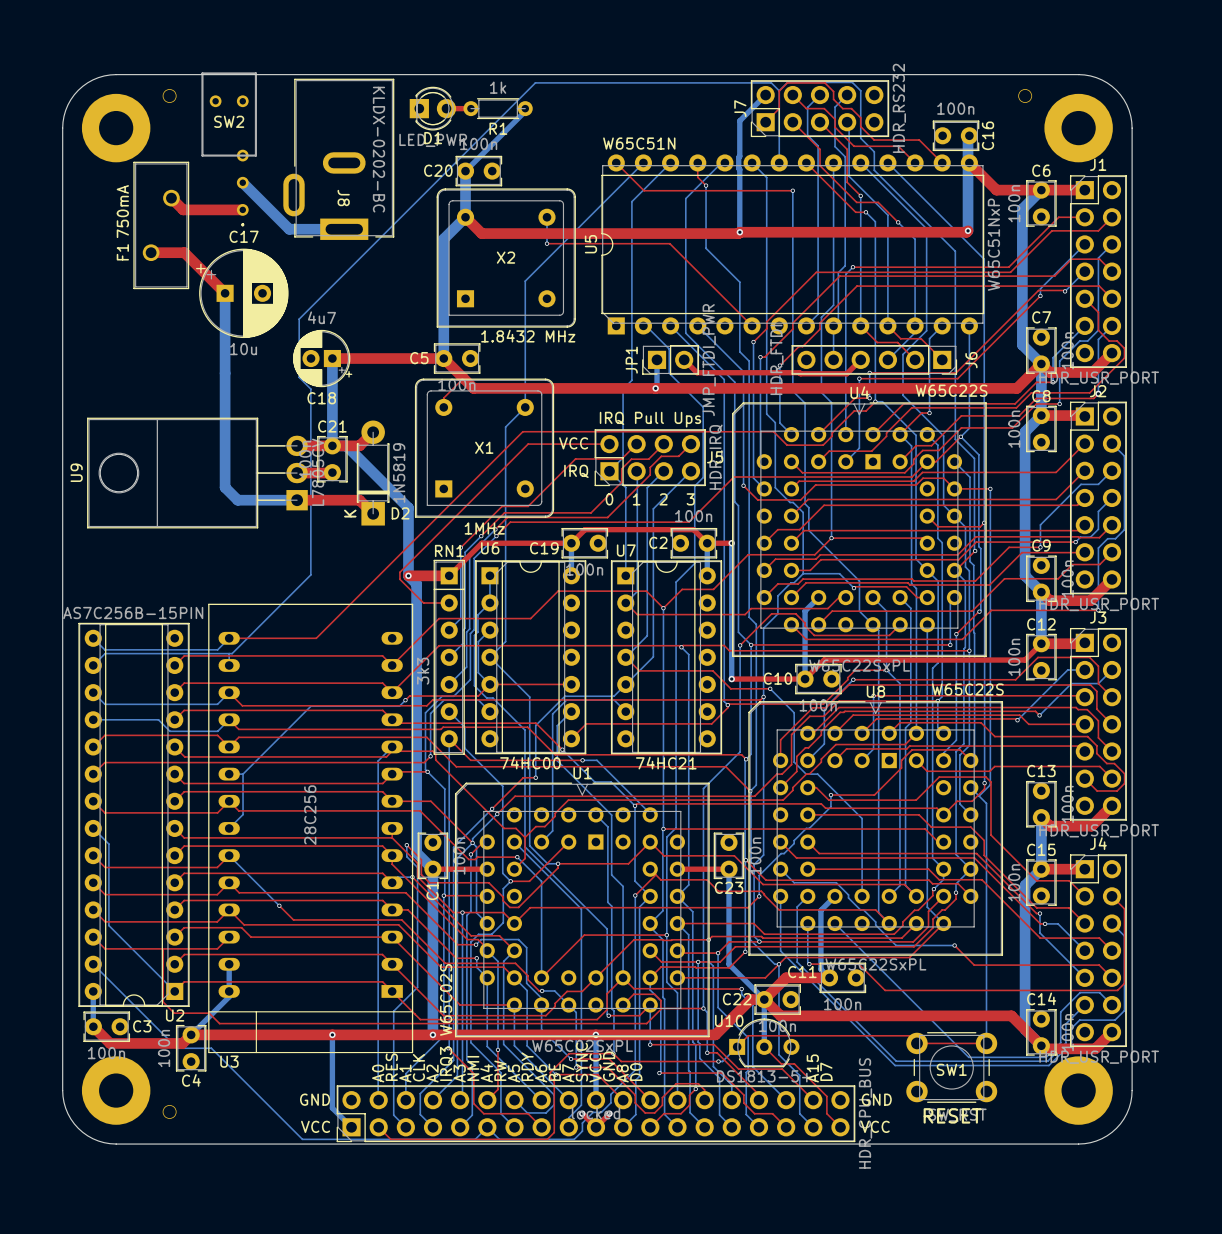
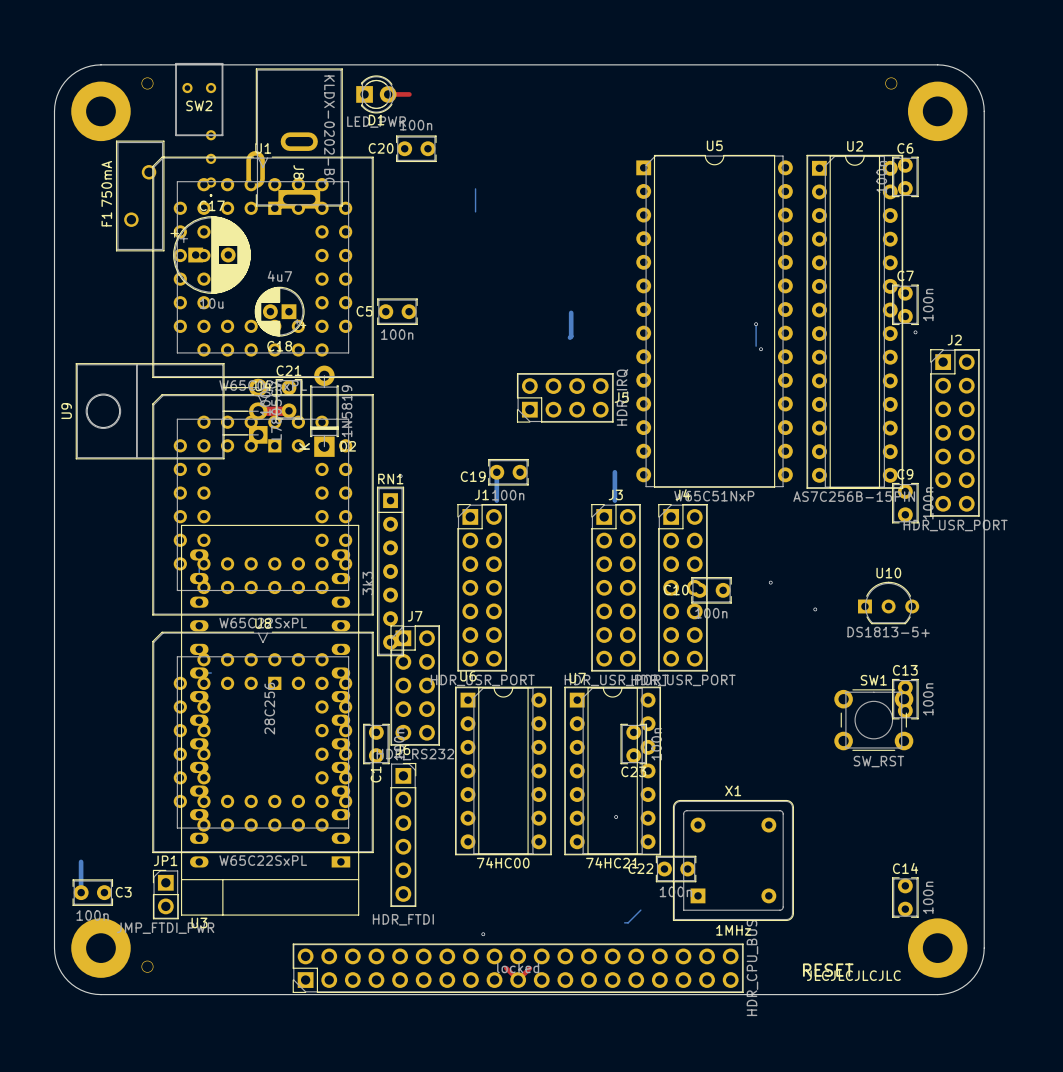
bottom track: (779, 90) (771, 82) (535, 82) (299, 319) (299, 377) (310, 389) (310, 574) (232, 653) (105, 653) (93, 665) -> none
bottom track: (779, 90) (787, 82) (852, 82) (860, 90) (860, 138) (874, 151) (874, 170) (955, 251) (955, 439) (974, 458) (975, 551) -> none
bottom track: (779, 90) (779, 162) -> none
bottom track: (765, 95) (739, 120) (739, 232) -> none
top track: (792, 95) (806, 108) (824, 108) (835, 119) (835, 127) (854, 146) (898, 146) (915, 162) -> none
bottom track: (819, 95) (807, 107) (807, 135) (818, 145) (818, 314) (806, 325) -> none
bottom track: (847, 95) (835, 107) (835, 146) (845, 156) (845, 265) (838, 272) (838, 321) (833, 325) (833, 359) -> none
R1: 1k (498, 108) -> none
bottom track: (525, 108) (525, 111) (465, 171) (465, 217) (443, 239) (443, 358) -> none
J7 rotation: 0° (819, 108) -> 90° clockwise (415, 685)
J7 position: (819, 108) -> (415, 685)
top track: (765, 122) (779, 108) (779, 91) (787, 82) (824, 82) (833, 91) (833, 99) (842, 108) (851, 108) (860, 117) (860, 126) (874, 140) (919, 140) (942, 162) -> none
top track: (792, 122) (819, 149) (819, 165) (856, 202) (878, 202) (898, 222) -> none
top track: (819, 122) (847, 149) (847, 182) (860, 195) -> none
bottom track: (847, 122) (849, 124) (849, 176) (887, 215) (887, 325) -> none
C16: 100n (956, 135) -> none
bottom track: (969, 135) (968, 230) -> none
text: W65C51N (639, 143) -> none
top track: (616, 162) (644, 190) (792, 190) -> none
bottom track: (643, 162) (525, 281) (525, 407) (505, 427) (505, 641) (489, 657) (529, 697) (529, 845) (547, 863) (558, 863) -> none
bottom track: (670, 162) (631, 201) (631, 380) (623, 389) (623, 457) (609, 471) (625, 487) (625, 575) -> none
top track: (697, 162) (697, 177) (706, 185) -> none
bottom track: (724, 162) (721, 162) (685, 198) (685, 333) (734, 382) (734, 501) (738, 505) (738, 632) (751, 644) (751, 754) (745, 760) (745, 860) -> none
bottom track: (752, 162) (766, 177) (766, 414) (775, 422) (775, 487) (803, 512) (803, 573) -> none
top track: (806, 162) (855, 212) (865, 212) -> none
bottom track: (833, 162) (833, 305) (821, 317) (821, 392) (831, 402) (831, 538) -> none
bottom track: (860, 162) (926, 228) (926, 330) (902, 354) (902, 395) (943, 435) (943, 505) (965, 527) (965, 567) (969, 570) (969, 745) (959, 755) (959, 803) (970, 814) -> none
bottom track: (887, 162) (984, 259) (984, 783) -> none
top track: (969, 162) (996, 190) (1084, 190) -> none
bottom track: (242, 182) (289, 229) (344, 229) -> none
bottom track: (706, 185) (706, 248) (739, 282) (739, 351) (749, 361) (749, 617) (756, 624) (756, 785) (750, 791) (750, 939) (774, 964) (778, 964) (778, 1054) (799, 1075) (799, 1113) (813, 1127) -> none
via: (706, 185) -> none
bottom track: (792, 190) (792, 391) (805, 403) (805, 503) (808, 507) (808, 530) (859, 581) (859, 611) (878, 630) (878, 912) (889, 923) -> none
via: (792, 190) -> none
bottom track: (1041, 190) (1022, 209) (1022, 344) (1041, 363) (1041, 415) (1025, 431) (1025, 575) (1041, 592) (1041, 643) -> none
bottom track: (860, 195) (860, 325) -> none
via: (860, 195) -> none
top track: (171, 198) (183, 209) (242, 209) -> none
bottom track: (865, 212) (875, 221) (875, 401) (882, 401) (916, 435) (916, 559) (938, 581) (938, 662) (932, 668) (932, 858) (943, 869) (943, 879) (933, 889) -> none
via: (865, 212) -> none
top track: (465, 217) (481, 233) (968, 230) -> none
top track: (1084, 217) (1058, 217) (1008, 267) (852, 267) -> none
top track: (1112, 217) (1098, 230) (1051, 230) (1010, 272) (816, 272) (767, 321) (767, 328) (753, 342) -> none
bottom track: (898, 222) (915, 239) (915, 332) (887, 359) -> none
via: (898, 222) -> none
via: (968, 230) -> none
via: (739, 232) -> none
top track: (547, 243) (669, 243) (752, 325) -> none
via: (547, 243) -> none
U5 rotation: 0° (792, 244) -> 90° clockwise (714, 321)
bottom track: (1084, 244) (1040, 288) (1040, 295) -> none
bottom track: (1112, 244) (1098, 258) (1098, 330) (1087, 341) (1079, 341) (1059, 361) (1059, 404) -> none
top track: (151, 252) (184, 252) (225, 293) -> none
X2: 1.8432 MHz (506, 258) -> none
bottom track: (852, 267) (845, 274) (845, 434) -> none
via: (852, 267) -> none
bottom track: (1084, 271) (1065, 291) -> none
J1 position: (1098, 271) -> (482, 587)
top track: (1112, 271) (1099, 259) (1071, 259) (1054, 276) (839, 276) (792, 323) (792, 329) (764, 357) (760, 357) -> none
top track: (1065, 291) (1038, 290) (956, 372) (869, 372) -> none
via: (1065, 291) -> none
top track: (1040, 295) (957, 378) (859, 378) -> none
via: (1040, 295) -> none
top track: (1084, 298) (1098, 312) (1098, 330) (1109, 341) (1117, 341) (1124, 348) (1124, 358) (1089, 392) (1031, 392) (1016, 407) (911, 407) (871, 451) (829, 451) (818, 461) -> none
top track: (1112, 298) (1099, 286) (856, 286) (819, 323) (819, 329) (779, 365) -> none
bottom track: (643, 325) (646, 325) (669, 349) (669, 373) (703, 407) (703, 477) (694, 486) (694, 563) (676, 582) (676, 827) (666, 837) (666, 982) (677, 992) (677, 1100) -> none
bottom track: (670, 325) (724, 379) (724, 701) (727, 705) -> none
bottom track: (697, 325) (743, 371) (743, 485) -> none
top track: (860, 325) (877, 342) (897, 342) (915, 359) -> none
top track: (887, 325) (900, 338) (921, 338) (942, 359) -> none
bottom track: (942, 325) (929, 338) (929, 413) -> none
bottom track: (969, 325) (969, 428) (960, 436) (978, 454) (978, 546) (980, 548) (979, 611) -> none
bottom track: (1084, 325) (1053, 357) (1053, 382) -> none
bottom track: (1112, 325) (1098, 339) (1098, 393) -> none
bottom track: (753, 342) (753, 478) (764, 488) -> none
via: (753, 342) -> none
top track: (1112, 353) (1092, 372) (1049, 372) (1041, 363) (1016, 388) (473, 388) (463, 378) -> none
bottom track: (760, 357) (760, 457) (764, 461) -> none
via: (760, 357) -> none
top track: (332, 358) (443, 358) (463, 378) -> none
bottom track: (332, 358) (332, 445) (346, 445) (408, 507) (408, 575) (416, 583) (416, 852) (432, 869) (432, 1034) -> none
JP1 rotation: 0° (670, 359) -> 90° clockwise (165, 894)
JP1 position: (670, 359) -> (165, 894)
top track: (684, 359) (697, 372) (800, 373) (846, 373) (860, 359) -> none
J6 rotation: 0° (874, 359) -> 90° counterclockwise (403, 834)
J6 position: (874, 359) -> (403, 834)
bottom track: (779, 365) (779, 423) (791, 434) -> none
via: (779, 365) -> none
bottom track: (225, 373) (225, 293) (225, 487) (237, 500) (297, 500) -> none
top track: (463, 378) (443, 398) (443, 407) -> none
bottom track: (859, 378) (859, 448) (845, 461) -> none
via: (859, 378) -> none
top track: (1053, 382) (1036, 382) (1015, 403) (903, 403) (872, 434) -> none
via: (655, 388) -> none
text: W65C22S (951, 390) -> none
top track: (1098, 393) (1093, 398) (1036, 398) (1019, 415) (961, 415) (931, 445) (916, 445) (900, 461) -> none
via: (1098, 393) -> none
top track: (869, 398) (855, 398) (818, 434) -> none
via: (869, 398) -> none
top track: (875, 401) (866, 411) (854, 411) (823, 445) (787, 445) (773, 431) (522, 431) (316, 638) (229, 638) -> none
top track: (1059, 404) (1036, 404) (1012, 427) (961, 427) (938, 450) (922, 450) (904, 472) (802, 472) (791, 461) -> none
via: (1059, 404) -> none
top track: (929, 413) (921, 413) (900, 434) -> none
via: (929, 413) -> none
top track: (1041, 415) (1084, 416) -> none
text: IRQ Pull Ups (650, 419) -> none
C8: 100n (1041, 428) -> none
top track: (373, 432) (359, 445) (297, 445) -> none
bottom track: (900, 434) (911, 446) (911, 583) (916, 588) (916, 733) -> none
bottom track: (927, 434) (937, 445) (937, 538) (942, 542) (942, 696) (937, 701) (937, 727) (943, 733) -> none
top track: (960, 436) (935, 461) (927, 461) (912, 477) (733, 477) (688, 522) (510, 522) (496, 536) -> none
via: (960, 436) -> none
text: VCC (573, 443) -> none
top track: (1084, 443) (1056, 472) (922, 472) (913, 481) (799, 481) (791, 488) -> none
bottom track: (1112, 443) (1124, 456) (1124, 529) (1115, 538) (1107, 538) (1098, 548) (1098, 610) -> none
top track: (609, 444) (528, 444) (399, 572) (399, 579) (423, 602) (449, 602) -> none
top track: (636, 444) (621, 459) (575, 459) (528, 506) (502, 506) (460, 547) -> none
top track: (663, 444) (648, 459) (631, 459) (621, 468) (621, 482) (591, 512) (504, 512) (481, 536) -> none
top track: (690, 444) (678, 456) (661, 456) (650, 467) (650, 474) (607, 517) (507, 517) (495, 529) -> none
X1 name position: X1 (484, 447) -> X1 (733, 790)
X1 position: (484, 448) -> (733, 860)
bottom track: (954, 461) (969, 477) (969, 561) (973, 565) (974, 633) (974, 756) (970, 760) -> none
top track: (1084, 470) (1056, 499) (808, 499) (791, 516) -> none
bottom track: (1112, 470) (1098, 484) (1080, 484) (1040, 524) (1040, 547) -> none
text: IRQ (576, 471) -> none
bottom track: (636, 471) (637, 591) (625, 602) -> none
bottom track: (663, 471) (647, 487) (647, 635) (625, 657) -> none
bottom track: (690, 471) (653, 508) (653, 656) (614, 696) (564, 696) (535, 725) (535, 777) -> none
top track: (743, 485) (757, 499) (800, 499) (815, 485) (916, 485) (923, 478) (943, 478) (954, 488) (990, 488) -> none
via: (743, 485) -> none
bottom track: (990, 488) (990, 784) (979, 796) -> none
via: (990, 488) -> none
top track: (1084, 497) (1077, 505) (824, 505) (799, 529) (777, 529) (764, 543) -> none
bottom track: (1112, 497) (1098, 511) (1098, 529) (1090, 537) (1080, 537) (1075, 542) -> none
text: 0 (609, 499) -> none
text: 1 (636, 499) -> none
text: 2 (663, 499) -> none
text: 3 (690, 499) -> none
top track: (297, 500) (359, 500) (373, 513) -> none
top track: (927, 516) (938, 526) (980, 526) (984, 522) -> none
via: (984, 522) -> none
top track: (1084, 525) (1079, 530) (804, 530) (791, 543) -> none
top track: (1112, 525) (1099, 537) (975, 536) (957, 554) (820, 554) (815, 559) (775, 559) (764, 570) -> none
bottom track: (495, 529) (469, 555) (469, 629) (466, 632) (466, 667) (449, 684) -> none
via: (495, 529) -> none
U4 position: (859, 529) -> (262, 504)
bottom track: (481, 536) (465, 552) (465, 628) (462, 630) (462, 643) (449, 657) -> none
via: (481, 536) -> none
bottom track: (496, 536) (474, 558) (474, 629) (470, 633) (470, 679) (453, 696) (442, 696) (425, 712) (425, 769) (444, 789) (443, 1035) (405, 1073) (405, 1100) -> none
via: (496, 536) -> none
via: (831, 538) -> none
top track: (1075, 542) (976, 542) (958, 559) (820, 559) (810, 570) (791, 570) -> none
via: (1075, 542) -> none
C2: 100n (693, 543) -> none
top track: (731, 543) (707, 543) (693, 529) (585, 529) (571, 543) (481, 543) (449, 575) (408, 575) -> none
bottom track: (731, 543) (731, 679) -> none
via: (731, 543) -> none
top track: (927, 543) (922, 538) (831, 538) (814, 554) (748, 554) (713, 589) (682, 589) (663, 608) (646, 591) (558, 591) (530, 618) (439, 618) (392, 665) (382, 655) (184, 655) (174, 665) -> none
bottom track: (460, 547) (460, 618) (449, 630) -> none
top track: (1040, 547) (1009, 547) (975, 580) (803, 579) (798, 583) (777, 583) (764, 597) -> none
via: (1040, 547) -> none
top track: (975, 551) (954, 570) -> none
via: (975, 551) -> none
top track: (1084, 552) (1022, 552) (989, 585) (806, 582) (791, 597) -> none
top track: (1112, 552) (1099, 564) (1072, 564) (1058, 578) (1004, 578) (972, 611) (832, 611) (818, 624) -> none
bottom track: (954, 570) (965, 581) (963, 743) (956, 751) (956, 854) (970, 869) (956, 883) (956, 892) -> none
bottom track: (803, 573) (839, 573) (853, 588) -> none
bottom track: (803, 573) (777, 595) (777, 613) (763, 628) (763, 855) (754, 864) (754, 936) (759, 941) -> none
via: (408, 575) -> none
bottom track: (489, 575) (489, 602) (477, 614) (477, 632) (474, 635) (474, 685) (486, 698) (492, 698) (524, 730) (524, 846) (607, 929) (607, 1014) (608, 1015) -> none
top track: (1112, 579) (1090, 600) (1049, 600) (1041, 592) -> none
top track: (853, 588) (906, 586) (917, 597) (927, 597) -> none
via: (853, 588) -> none
bottom track: (818, 597) (805, 611) (805, 679) -> none
top track: (845, 597) (838, 597) (827, 608) (751, 608) (745, 614) (637, 614) (625, 602) -> none
bottom track: (872, 597) (886, 611) (886, 670) (899, 683) (899, 885) (889, 896) -> none
bottom track: (900, 597) (910, 608) (910, 722) (905, 727) (905, 885) (916, 896) -> none
bottom track: (954, 597) (950, 601) (950, 644) -> none
bottom track: (663, 608) (662, 910) (650, 923) (650, 927) (662, 939) (664, 1114) (677, 1127) -> none
via: (663, 608) -> none
top track: (1098, 610) (991, 610) (962, 639) (806, 639) (791, 624) -> none
via: (1098, 610) -> none
top track: (979, 611) (956, 634) -> none
via: (979, 611) -> none
top track: (900, 624) (889, 635) (814, 635) (795, 613) (771, 613) (740, 645) -> none
bottom track: (927, 624) (927, 907) (943, 923) -> none
bottom track: (489, 630) (478, 641) (478, 672) (489, 684) -> none
bottom track: (956, 634) (956, 740) (943, 753) (943, 760) -> none
via: (956, 634) -> none
bottom track: (93, 638) (104, 649) (217, 649) (229, 638) -> none
top track: (1084, 642) (1041, 643) (1025, 660) (824, 660) (805, 679) (731, 679) -> none
top track: (751, 644) (950, 644) -> none
via: (751, 644) -> none
via: (950, 644) -> none
bottom track: (740, 645) (740, 751) (703, 788) (703, 1008) (707, 1012) (707, 1052) -> none
via: (740, 645) -> none
bottom track: (681, 647) (688, 654) (688, 885) (677, 896) (692, 911) (692, 1042) (695, 1045) (695, 1089) -> none
via: (681, 647) -> none
top track: (969, 650) (729, 650) (724, 645) (683, 645) (681, 647) (679, 645) (439, 645) (392, 692) (382, 683) (184, 683) (174, 692) -> none
via: (969, 650) -> none
U6 position: (530, 657) -> (503, 770)
top track: (625, 657) (639, 670) (712, 670) (730, 688) (770, 688) -> none
U7 position: (666, 657) -> (612, 770)
C12: 100n (1041, 657) -> none
top track: (886, 670) (855, 670) (823, 704) (728, 704) (727, 707) (711, 723) (586, 723) (571, 738) -> none
bottom track: (1084, 670) (1067, 670) (1017, 720) -> none
bottom track: (1112, 670) (1098, 683) (1071, 683) (1039, 715) -> none
via: (731, 679) -> none
top track: (853, 679) (1015, 679) (1038, 657) (1089, 657) (1098, 666) (1098, 683) (1112, 697) -> none
bottom track: (853, 679) (824, 708) (824, 743) (807, 760) -> none
via: (853, 679) -> none
top track: (571, 684) (489, 684) (478, 696) (409, 696) (405, 700) -> none
bottom track: (770, 688) (794, 712) (794, 762) (806, 774) (817, 774) (862, 818) (862, 896) -> none
via: (770, 688) -> none
text: W65C22S (967, 689) -> none
bottom track: (93, 692) (104, 704) (217, 704) (229, 692) -> none
top track: (229, 692) (242, 705) (426, 705) (432, 699) (760, 699) (763, 696) -> none
top track: (873, 695) (1084, 697) -> none
bottom track: (873, 695) (873, 749) (862, 760) -> none
via: (873, 695) -> none
via: (763, 696) -> none
bottom track: (405, 700) (399, 706) (310, 706) (243, 774) (243, 814) (229, 828) -> none
via: (405, 700) -> none
top track: (937, 701) (839, 701) (823, 716) (809, 716) (791, 734) (791, 764) (782, 774) (776, 774) (754, 796) (515, 796) (497, 814) -> none
via: (727, 705) -> none
bottom track: (449, 711) (464, 727) (464, 748) (502, 786) (502, 873) (510, 881) (503, 888) (503, 922) (491, 934) (478, 934) (470, 942) (470, 1042) (500, 1072) (500, 1113) (514, 1127) -> none
bottom track: (489, 711) (478, 700) (444, 700) (430, 713) (430, 756) -> none
bottom track: (571, 711) (557, 725) (557, 760) (611, 815) (611, 875) (623, 886) (623, 977) -> none
bottom track: (625, 711) (614, 700) (566, 700) (552, 714) (552, 830) (541, 842) -> none
top track: (1039, 715) (1035, 711) (840, 712) (821, 731) (821, 735) (796, 756) (796, 771) (780, 787) -> none
via: (1039, 715) -> none
bottom track: (93, 719) (158, 719) (169, 731) (217, 731) (229, 719) -> none
top track: (174, 719) (184, 710) (382, 710) (395, 723) (535, 723) (562, 749) -> none
top track: (229, 719) (238, 729) (440, 729) (443, 727) (527, 727) (555, 754) (741, 754) (746, 759) -> none
top track: (1017, 720) (876, 718) (862, 733) -> none
via: (1017, 720) -> none
top track: (1084, 724) (1028, 724) (1019, 715) (853, 715) (834, 733) -> none
J3 position: (1098, 724) -> (616, 587)
top track: (1112, 724) (1096, 709) (1096, 691) (1090, 685) (848, 685) (826, 707) (812, 707) (780, 739) (780, 760) -> none
top track: (807, 733) (813, 733) (838, 707) (1076, 707) (1078, 709) (1087, 709) (1098, 720) (1098, 737) (1112, 751) -> none
top track: (889, 733) (899, 722) (981, 722) (994, 736) (1087, 736) (1096, 745) (1096, 753) (1106, 763) (1114, 763) (1124, 773) (1124, 783) (1117, 790) (1097, 790) (1084, 778) -> none
top track: (916, 733) (905, 744) (835, 744) (809, 774) (806, 774) (792, 787) (792, 790) (783, 800) (568, 800) (544, 826) (535, 826) (525, 837) -> none
top track: (449, 738) (470, 760) (582, 760) -> none
bottom track: (449, 738) (448, 1048) -> none
top track: (93, 746) (104, 735) (217, 735) (229, 746) (238, 737) (426, 737) (456, 766) (725, 766) (750, 791) -> none
top track: (174, 746) (184, 756) (386, 756) (392, 751) -> none
bottom track: (392, 746) (378, 760) (378, 1100) -> none
bottom track: (562, 749) (594, 781) (611, 781) (635, 805) (635, 881) (650, 896) (639, 907) (639, 1076) (635, 1080) (635, 1114) (623, 1127) -> none
via: (562, 749) -> none
top track: (392, 751) (432, 751) (435, 754) (435, 759) (504, 828) (516, 828) (525, 837) -> none
top track: (1084, 751) (1079, 746) (909, 746) (906, 748) (846, 748) (834, 760) -> none
top track: (430, 756) (424, 762) (104, 762) (93, 774) -> none
via: (430, 756) -> none
via: (746, 759) -> none
bottom track: (582, 760) (596, 760) (650, 814) -> none
via: (582, 760) -> none
top track: (916, 760) (927, 771) (989, 771) (994, 766) (1099, 766) (1112, 778) -> none
top track: (970, 760) (960, 749) (912, 749) (901, 760) (901, 768) (874, 795) (830, 795) -> none
top track: (427, 771) (394, 771) (382, 783) (184, 783) (174, 774) -> none
via: (427, 771) -> none
top track: (535, 777) (523, 777) (492, 808) -> none
via: (535, 777) -> none
top track: (984, 783) (984, 788) (972, 801) (957, 801) (943, 814) (936, 808) (825, 808) (821, 803) (636, 803) (635, 805) -> none
via: (984, 783) -> none
top track: (807, 787) (816, 787) (828, 800) (916, 800) (939, 777) (985, 777) (990, 782) (990, 835) (1036, 880) (1069, 880) (1084, 896) -> none
bottom track: (970, 787) (986, 803) (986, 1043) -> none
via: (750, 791) -> none
bottom track: (830, 795) (830, 806) (759, 875) (759, 896) -> none
via: (830, 795) -> none
top track: (93, 801) (104, 812) (217, 812) (229, 801) (238, 810) (420, 810) (468, 859) (475, 859) (477, 857) (517, 857) -> none
top track: (174, 801) (184, 791) (382, 791) (392, 801) (430, 801) (472, 842) -> none
via: (635, 805) -> none
bottom track: (492, 808) (453, 847) (453, 1060) (420, 1093) (420, 1114) (433, 1127) -> none
via: (492, 808) -> none
U2 rotation: 0° (134, 814) -> 180° (854, 321)
U2 position: (134, 814) -> (854, 321)
bottom track: (497, 814) (472, 838) (472, 842) -> none
via: (497, 814) -> none
bottom track: (595, 814) (607, 826) (607, 902) (611, 906) (613, 1053) -> none
top track: (807, 814) (919, 814) (931, 827) (970, 827) (984, 840) (984, 855) (1036, 907) (1069, 907) (1084, 923) -> none
top track: (1103, 814) (1112, 805) (1091, 826) (1049, 826) (1041, 817) -> none
bottom track: (1041, 817) (1041, 869) (1025, 885) (1025, 1029) (1041, 1045) -> none
bottom track: (93, 828) (108, 844) (108, 925) (174, 991) -> none
top track: (174, 828) (184, 837) (392, 837) (417, 863) (417, 876) (453, 912) (503, 912) (514, 923) (530, 907) (747, 907) (759, 896) -> none
U8 position: (875, 828) -> (262, 742)
top track: (663, 829) (925, 829) (938, 842) (943, 842) -> none
via: (663, 829) -> none
top track: (525, 837) (525, 858) (514, 869) -> none
bottom track: (472, 842) (476, 846) (476, 912) (487, 923) -> none
bottom track: (472, 842) (457, 858) (457, 1075) (433, 1100) -> none
via: (472, 842) -> none
top track: (487, 842) (483, 842) (470, 854) -> none
bottom track: (514, 842) (581, 909) (581, 1105) (568, 1117) (568, 1127) -> none
top track: (568, 842) (529, 881) (510, 881) -> none
top track: (780, 842) (796, 857) (974, 857) (1040, 923) (1045, 923) -> none
top track: (807, 842) (819, 853) (976, 853) (1036, 913) (1039, 913) -> none
top track: (406, 845) (421, 859) (421, 874) (429, 882) (488, 882) (503, 897) (503, 900) (509, 907) (518, 907) (558, 867) (558, 863) (628, 863) (650, 842) (664, 855) (734, 855) (763, 884) (904, 884) (916, 896) -> none
bottom track: (406, 845) (406, 856) (417, 867) (417, 987) (393, 1011) (393, 1115) (405, 1127) -> none
via: (406, 845) -> none
bottom track: (470, 854) (470, 911) (466, 915) (466, 1059) (472, 1065) (472, 1115) (460, 1127) -> none
via: (470, 854) -> none
top track: (93, 855) (105, 867) (217, 867) (229, 855) -> none
top track: (174, 855) (184, 846) (382, 846) (392, 855) (392, 864) (467, 939) (478, 939) (487, 950) -> none
bottom track: (229, 855) (279, 905) -> none
bottom track: (517, 857) (541, 881) (541, 977) -> none
via: (517, 857) -> none
top track: (745, 860) (765, 880) (929, 880) (932, 883) (958, 883) (970, 896) -> none
bottom track: (745, 860) (745, 951) -> none
via: (745, 860) -> none
via: (558, 863) -> none
top track: (432, 869) (487, 869) -> none
top track: (677, 869) (729, 869) -> none
bottom track: (729, 869) (729, 964) (764, 999) (764, 1046) -> none
bottom track: (780, 869) (794, 882) (836, 882) (848, 894) (848, 897) (860, 909) (863, 909) (896, 945) (954, 945) -> none
top track: (807, 869) (928, 869) (939, 879) (981, 879) (1040, 938) (1099, 938) (1112, 950) -> none
top track: (1041, 869) (1084, 869) -> none
top track: (655, 874) (660, 879) (707, 879) (718, 891) (761, 891) (779, 909) (875, 909) (889, 923) -> none
top track: (655, 874) (635, 895) -> none
top track: (412, 877) (471, 935) (499, 935) (514, 950) -> none
bottom track: (412, 877) (397, 877) (392, 882) -> none
via: (412, 877) -> none
via: (510, 881) -> none
top track: (93, 882) (105, 894) (217, 894) (229, 882) (239, 892) (405, 892) (457, 944) (476, 944) -> none
top track: (174, 882) (184, 873) (382, 873) (392, 882) -> none
C15: 100n (1041, 882) -> none
top track: (933, 889) (932, 895) (918, 910) (914, 910) (894, 934) (764, 934) (753, 923) (677, 923) -> none
via: (933, 889) -> none
top track: (956, 892) (956, 899) (933, 919) (933, 927) (914, 946) (735, 946) (720, 961) (661, 961) (650, 950) -> none
via: (956, 892) -> none
top track: (443, 895) (487, 896) -> none
via: (443, 895) -> none
bottom track: (635, 895) (635, 1070) (610, 1094) (610, 1102) (601, 1112) (593, 1112) (582, 1123) (582, 1131) (574, 1139) (499, 1139) (487, 1127) (475, 1139) (302, 1139) (211, 1048) (177, 1048) (93, 964) -> none
via: (635, 895) -> none
via: (759, 896) -> none
bottom track: (780, 896) (780, 951) (895, 1065) (1048, 1065) (1071, 1042) (1071, 1028) (1079, 1020) (1115, 1020) (1124, 1010) (1124, 936) (1112, 923) -> none
bottom track: (807, 896) (797, 906) (797, 962) (896, 1061) (1047, 1061) (1065, 1043) (1065, 1023) (1084, 1005) -> none
bottom track: (834, 896) (820, 910) (820, 969) (829, 977) -> none
top track: (943, 896) (928, 911) (928, 926) (913, 941) (729, 941) (718, 953) (679, 953) (677, 950) -> none
top track: (1112, 896) (1124, 908) (1124, 983) (1117, 990) (885, 990) (858, 964) (809, 964) -> none
top track: (279, 905) (293, 919) (401, 919) (445, 963) (515, 963) (527, 975) (527, 979) (539, 990) (542, 990) -> none
via: (279, 905) -> none
top track: (93, 909) (105, 921) (217, 921) (229, 909) (244, 924) (398, 924) (440, 967) (503, 967) (514, 977) -> none
top track: (174, 909) (184, 900) (382, 900) (392, 909) (407, 909) (456, 958) (476, 958) -> none
U1 position: (582, 909) -> (262, 267)
bottom track: (462, 912) (462, 1097) (460, 1100) -> none
via: (462, 912) -> none
bottom track: (1039, 913) (1039, 932) (1084, 977) -> none
via: (1039, 913) -> none
bottom track: (677, 923) (688, 934) (690, 1112) (704, 1127) -> none
bottom track: (807, 923) (807, 962) (809, 964) -> none
bottom track: (834, 923) (968, 1057) (1046, 1057) (1060, 1042) (1060, 1012) (1080, 992) (1099, 992) (1112, 1005) -> none
top track: (916, 923) (901, 938) (711, 936) (708, 939) (633, 939) (582, 991) (567, 991) (545, 1015) (443, 1015) (382, 954) (184, 954) (174, 964) -> none
top track: (943, 923) (909, 957) (785, 957) (765, 977) (677, 977) -> none
bottom track: (1045, 923) (1058, 923) (1084, 950) -> none
via: (1045, 923) -> none
top track: (666, 935) (584, 935) (541, 977) -> none
via: (666, 935) -> none
top track: (93, 937) (105, 948) (217, 948) (229, 937) -> none
top track: (174, 937) (184, 927) (241, 927) (251, 937) (392, 937) (460, 1005) (514, 1005) -> none
bottom track: (708, 939) (708, 961) (713, 966) (713, 1066) (731, 1085) (731, 1100) -> none
via: (759, 941) -> none
bottom track: (476, 944) (481, 939) (518, 939) (526, 947) (526, 983) (541, 998) (541, 1029) (571, 1059) -> none
via: (476, 944) -> none
top track: (954, 945) (974, 965) (1099, 965) (1112, 977) -> none
via: (954, 945) -> none
top track: (163, 948) (163, 1002) (174, 1013) (209, 1013) (219, 1023) (646, 1023) (660, 1009) (660, 1000) (654, 994) (633, 994) (623, 1005) -> none
bottom track: (487, 950) (497, 961) (497, 1049) -> none
bottom track: (514, 950) (503, 961) (503, 1044) (554, 1094) (554, 1104) (546, 1112) (527, 1112) (514, 1100) -> none
J4 position: (1098, 950) -> (682, 587)
top track: (745, 951) (729, 967) (661, 967) (650, 977) -> none
via: (745, 951) -> none
bottom track: (718, 953) (718, 1007) (748, 1037) (746, 1114) (758, 1127) -> none
via: (718, 953) -> none
bottom track: (476, 958) (476, 967) (487, 977) (487, 1046) (541, 1100) -> none
via: (476, 958) -> none
bottom track: (698, 961) (699, 1058) (719, 1078) (719, 1115) (731, 1127) -> none
via: (698, 961) -> none
bottom track: (229, 964) (229, 996) (191, 1034) -> none
via: (778, 964) -> none
via: (809, 964) -> none
bottom track: (514, 977) (527, 990) (527, 1045) (555, 1074) -> none
bottom track: (650, 977) (650, 990) (660, 1000) (659, 1073) -> none
top track: (829, 977) (786, 977) (764, 999) -> none
C11: 100n (842, 977) -> none
top track: (741, 989) (633, 988) (623, 977) (607, 993) (607, 1009) (597, 1019) (420, 1019) (382, 981) (184, 981) (174, 991) -> none
bottom track: (741, 989) (741, 994) (752, 1005) (752, 1066) (786, 1100) -> none
via: (741, 989) -> none
bottom track: (542, 990) (554, 990) (576, 1012) (576, 1067) -> none
via: (542, 990) -> none
text: W65C02S (446, 999) -> none
top track: (764, 999) (780, 1015) (1011, 1015) (1044, 1048) (1095, 1048) (1112, 1032) -> none
top track: (764, 999) (750, 999) (715, 1034) (191, 1034) (182, 1043) (110, 1043) (93, 1026) -> none
bottom track: (514, 1005) (514, 1045) (568, 1100) -> none
top track: (650, 1005) (639, 1015) (608, 1015) -> none
bottom track: (650, 1005) (650, 1044) -> none
top track: (660, 1008) (703, 1008) -> none
via: (703, 1008) -> none
U2 name position: U2 (175, 1015) -> U2 (855, 146)
via: (608, 1015) -> none
U10 name position: U10 (729, 1020) -> U10 (888, 573)
bottom track: (332, 1034) (332, 1108) (351, 1127) -> none
via: (332, 1034) -> none
via: (432, 1034) -> none
via: (595, 1034) -> none
bottom track: (596, 1035) (596, 1100) -> none
U10 position: (764, 1042) -> (888, 602)
top track: (986, 1043) (916, 1043) (909, 1035) (748, 1035) (737, 1046) -> none
top track: (650, 1044) (714, 1044) (738, 1069) (782, 1069) (813, 1100) -> none
via: (650, 1044) -> none
top track: (764, 1046) (781, 1063) (794, 1063) (826, 1096) (826, 1113) (840, 1127) -> none
C4: 100n (191, 1048) -> none
top track: (448, 1048) (473, 1073) (473, 1103) (483, 1113) (528, 1113) (541, 1127) -> none
via: (448, 1048) -> none
top track: (497, 1049) (497, 1089) (487, 1100) -> none
via: (497, 1049) -> none
top track: (707, 1052) (717, 1052) (758, 1094) (758, 1100) -> none
via: (707, 1052) -> none
via: (613, 1053) -> none
top track: (571, 1059) (609, 1059) (650, 1100) -> none
via: (571, 1059) -> none
top track: (718, 1061) (621, 1061) (613, 1053) (569, 1053) (550, 1072) (550, 1077) (554, 1081) (554, 1132) (547, 1139) (390, 1139) (378, 1127) -> none
via: (718, 1061) -> none
text: SYNC (581, 1062) -> none
text: IRQ3 (446, 1063) -> none
text: RDY (527, 1066) -> none
text: GND (609, 1066) -> none
text: RES (391, 1067) -> none
text: CLK (418, 1067) -> none
top track: (576, 1067) (607, 1067) (635, 1095) (635, 1102) (645, 1112) (654, 1112) (662, 1105) (662, 1097) (676, 1083) (698, 1083) (704, 1090) (704, 1100) -> none
via: (576, 1067) -> none
text: VCC (595, 1067) -> none
SW1 position: (951, 1067) -> (873, 720)
text: NMI (473, 1068) -> none
text: A15 (812, 1068) -> none
SW1 name position: SW1 (951, 1069) -> SW1 (873, 680)
text: RW (500, 1070) -> none
text: D7 (826, 1071) -> none
text: BE (554, 1072) -> none
text: D0 (636, 1072) -> none
text: A0 (378, 1073) -> none
text: A1 (405, 1073) -> none
text: A2 (432, 1073) -> none
text: A3 (459, 1073) -> none
text: A4 (486, 1073) -> none
text: A5 (514, 1073) -> none
text: A6 (541, 1073) -> none
text: A7 (568, 1073) -> none
text: A8 (622, 1073) -> none
top track: (659, 1073) (721, 1073) (743, 1095) (743, 1102) (754, 1113) (772, 1113) (786, 1127) -> none
via: (659, 1073) -> none
top track: (555, 1074) (597, 1074) (623, 1100) -> none
top track: (695, 1089) (689, 1095) (689, 1105) (680, 1113) (663, 1113) (650, 1127) -> none
via: (695, 1089) -> none
text: GND (315, 1099) -> none
text: GND (876, 1099) -> none
via: (582, 1113) -> none
via: (609, 1113) -> none
drawing: none -> [806, 970, 901, 982]
text: VCC (315, 1126) -> none
text: VCC (875, 1126) -> none

